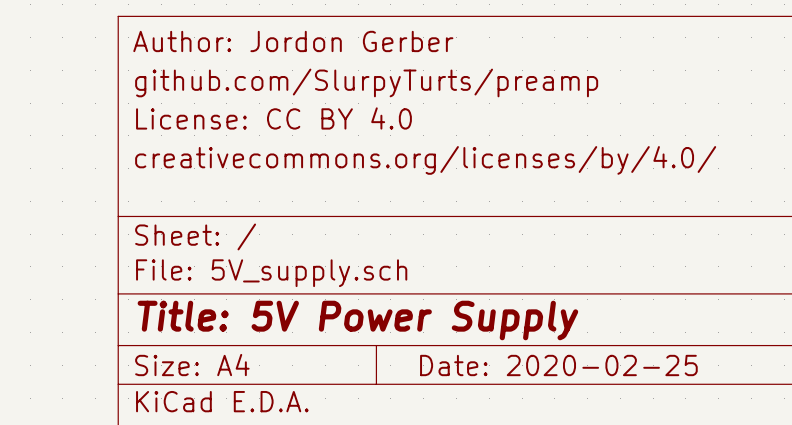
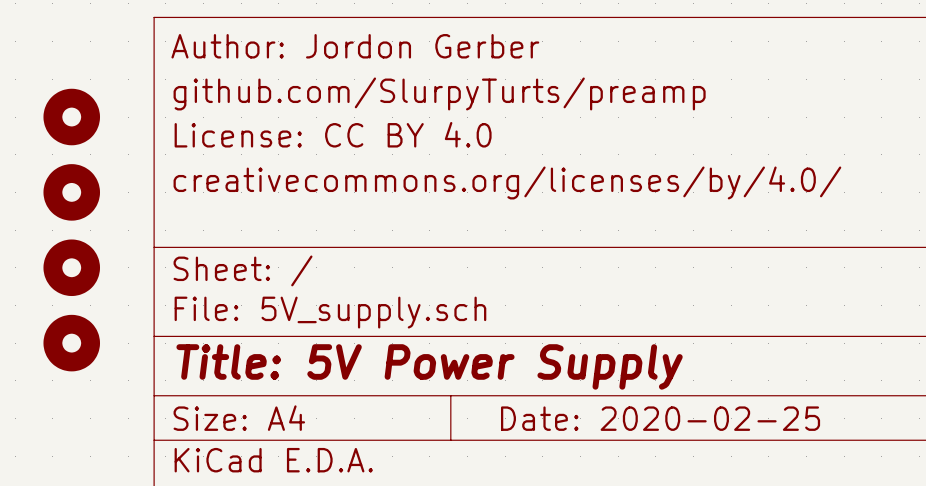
part: none -> (71, 117)
part: none -> (71, 192)
part: none -> (71, 267)
part: none -> (71, 343)

